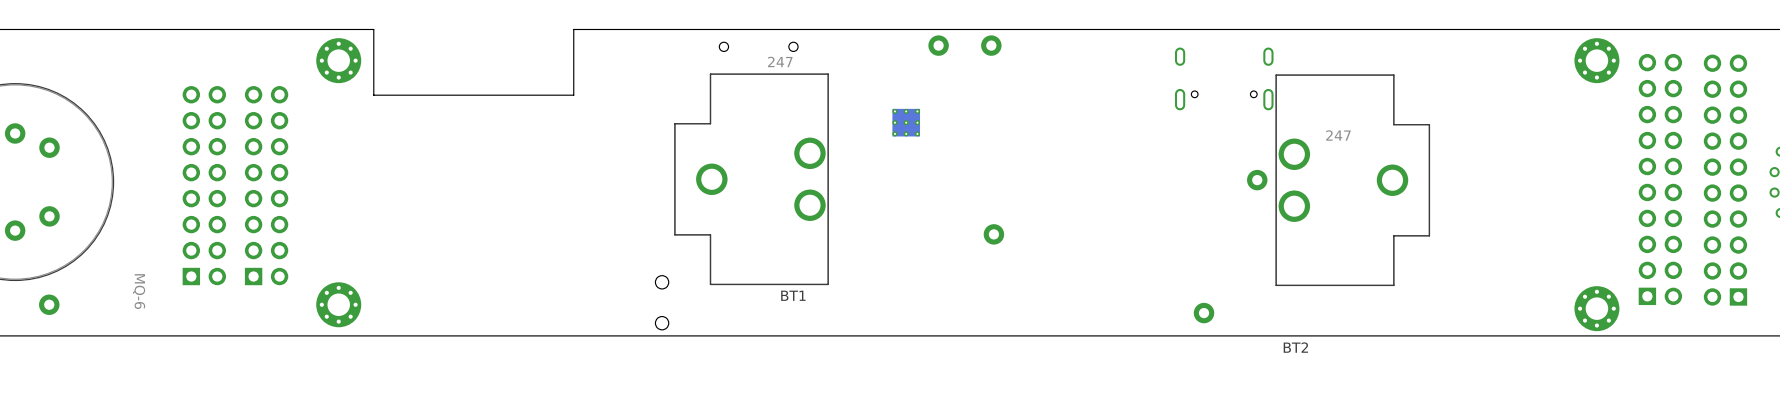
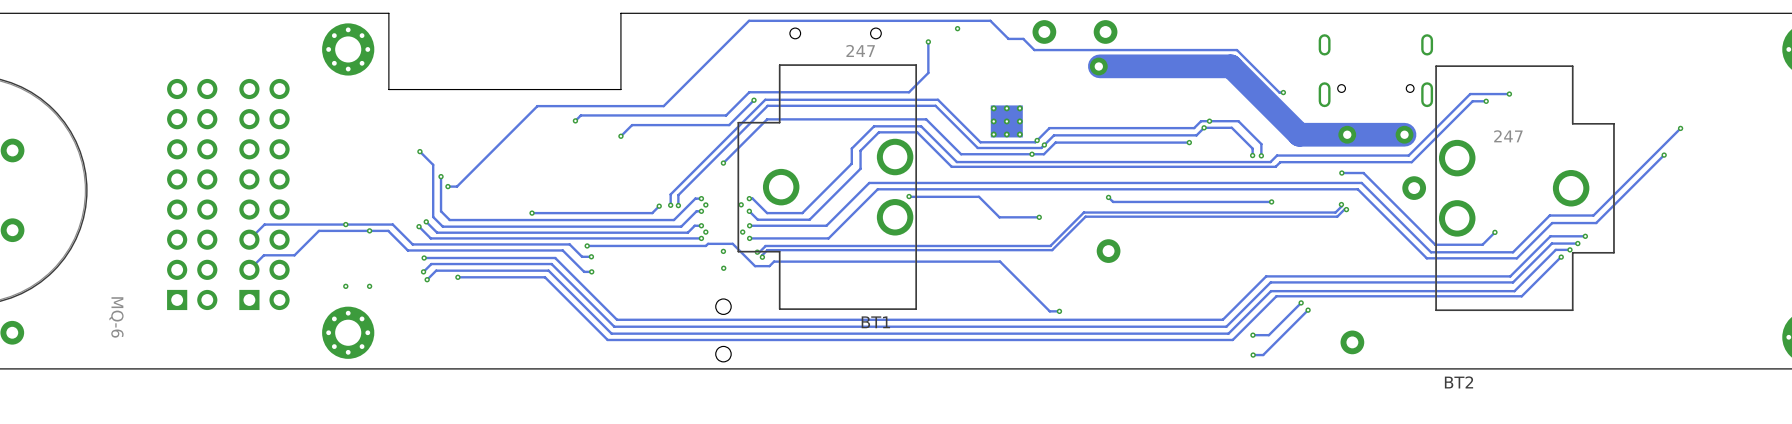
via: none -> (957, 28)
track: none -> (928, 41) (928, 72) (909, 92) (749, 92) (726, 115) (580, 115) (575, 120)
via: none -> (928, 41)
via: none -> (1098, 66)
track: none -> (1099, 66) (1230, 66) (1299, 134) (1404, 134)
track: none -> (1283, 92) (1279, 92) (1236, 50) (1034, 50) (1023, 38) (1008, 38) (990, 20) (749, 20) (663, 106) (537, 106) (457, 186) (447, 186)
via: none -> (1283, 92)
track: none -> (1509, 94) (1470, 94) (1408, 155) (1277, 155) (1270, 162) (956, 162) (921, 126) (874, 126) (851, 148) (851, 163) (802, 213) (767, 213) (752, 198) (749, 198)
via: none -> (1509, 94)
track: none -> (754, 100) (729, 125) (632, 125) (620, 136)
via: none -> (754, 100)
track: none -> (1486, 101) (1472, 101) (1411, 162) (1280, 162) (1275, 166) (951, 166) (917, 132) (878, 132) (860, 150) (860, 168) (809, 219) (757, 219) (749, 211)
via: none -> (1486, 101)
via: none -> (575, 120)
via: none -> (1209, 121)
via: none -> (1204, 127)
track: none -> (1680, 128) (1593, 215) (1549, 215) (1513, 252) (1431, 252) (1361, 182) (869, 182) (826, 225) (749, 225)
via: none -> (1680, 128)
via: none -> (1347, 134)
via: none -> (1404, 134)
via: none -> (620, 136)
via: none -> (1037, 140)
track: none -> (1189, 142) (1055, 142) (1043, 154) (961, 154) (926, 119) (767, 119) (723, 163)
via: none -> (1189, 142)
via: none -> (1044, 144)
track: none -> (419, 151) (433, 164) (433, 217) (442, 226) (681, 226) (696, 211) (701, 211)
via: none -> (419, 151)
via: none -> (1032, 154)
track: none -> (1664, 155) (1596, 223) (1552, 223) (1516, 258) (1426, 258) (1357, 189) (877, 189) (828, 238) (749, 238)
via: none -> (1664, 155)
track: none -> (1252, 155) (1252, 148) (1231, 127) (1204, 127) (1196, 135) (1054, 135) (1041, 148) (977, 148) (935, 105) (767, 105) (678, 195) (678, 205)
via: none -> (1252, 155)
track: none -> (1261, 155) (1261, 144) (1238, 121) (1201, 121) (1194, 128) (1049, 128) (1035, 142) (980, 142) (938, 99) (765, 99) (670, 194) (670, 205)
via: none -> (1261, 155)
via: none -> (723, 163)
track: none -> (1341, 173) (1363, 173) (1435, 244) (1482, 244) (1494, 232)
via: none -> (1341, 173)
track: none -> (441, 176) (441, 211) (449, 220) (673, 220) (695, 198) (701, 198)
via: none -> (441, 176)
via: none -> (447, 186)
track: none -> (909, 196) (978, 196) (999, 217) (1039, 217)
via: none -> (909, 196)
track: none -> (1108, 197) (1113, 201) (1271, 201)
via: none -> (1108, 197)
via: none -> (701, 198)
via: none -> (749, 198)
via: none -> (1271, 201)
via: none -> (670, 205)
via: none -> (705, 204)
via: none -> (741, 204)
track: none -> (1341, 204) (1335, 212) (1083, 212) (1050, 245) (765, 245) (757, 252)
via: none -> (1341, 204)
track: none -> (659, 206) (652, 213) (532, 213)
via: none -> (659, 206)
via: none -> (678, 205)
track: none -> (1346, 209) (1337, 216) (1085, 216) (1052, 250) (767, 250) (762, 257)
via: none -> (1346, 209)
via: none -> (701, 211)
via: none -> (749, 211)
via: none -> (532, 213)
via: none -> (1039, 217)
track: none -> (426, 221) (437, 232) (687, 232) (694, 225) (701, 225)
via: none -> (426, 221)
via: none -> (345, 224)
via: none -> (701, 225)
via: none -> (749, 225)
track: none -> (419, 226) (430, 238) (701, 238)
via: none -> (419, 226)
via: none -> (369, 230)
via: none -> (705, 232)
via: none -> (742, 232)
via: none -> (1494, 232)
track: none -> (1585, 236) (1550, 236) (1510, 276) (1266, 276) (1222, 319) (617, 319) (555, 258) (424, 258)
via: none -> (1585, 236)
via: none -> (701, 238)
via: none -> (749, 238)
track: none -> (249, 239) (264, 224) (392, 224) (412, 244) (569, 244) (582, 256) (591, 256)
track: none -> (1577, 243) (1551, 243) (1513, 282) (1270, 282) (1226, 326) (614, 326) (551, 264) (431, 264) (423, 271)
via: none -> (1577, 243)
track: none -> (587, 245) (705, 245) (708, 243) (732, 243) (755, 266) (769, 266) (774, 261) (1000, 261) (1049, 311) (1059, 311)
via: none -> (587, 245)
track: none -> (1569, 249) (1555, 249) (1514, 291) (1271, 291) (1228, 333) (611, 333) (548, 270) (436, 270) (427, 279)
via: none -> (1569, 249)
via: none -> (723, 251)
via: none -> (757, 252)
via: none -> (591, 256)
via: none -> (762, 257)
track: none -> (1561, 257) (1521, 296) (1276, 296) (1232, 339) (607, 339) (545, 277) (457, 277)
via: none -> (1561, 257)
via: none -> (424, 258)
via: none -> (723, 268)
track: none -> (249, 269) (263, 255) (294, 255) (318, 230) (388, 230) (407, 250) (562, 250) (584, 271) (591, 271)
via: none -> (423, 271)
via: none -> (591, 271)
via: none -> (457, 277)
via: none -> (427, 279)
via: none -> (345, 286)
via: none -> (369, 286)
track: none -> (1301, 302) (1268, 335) (1252, 335)
via: none -> (1301, 302)
track: none -> (1308, 310) (1263, 355) (1253, 355)
via: none -> (1308, 310)
via: none -> (1059, 311)
via: none -> (1252, 335)
via: none -> (1253, 355)

